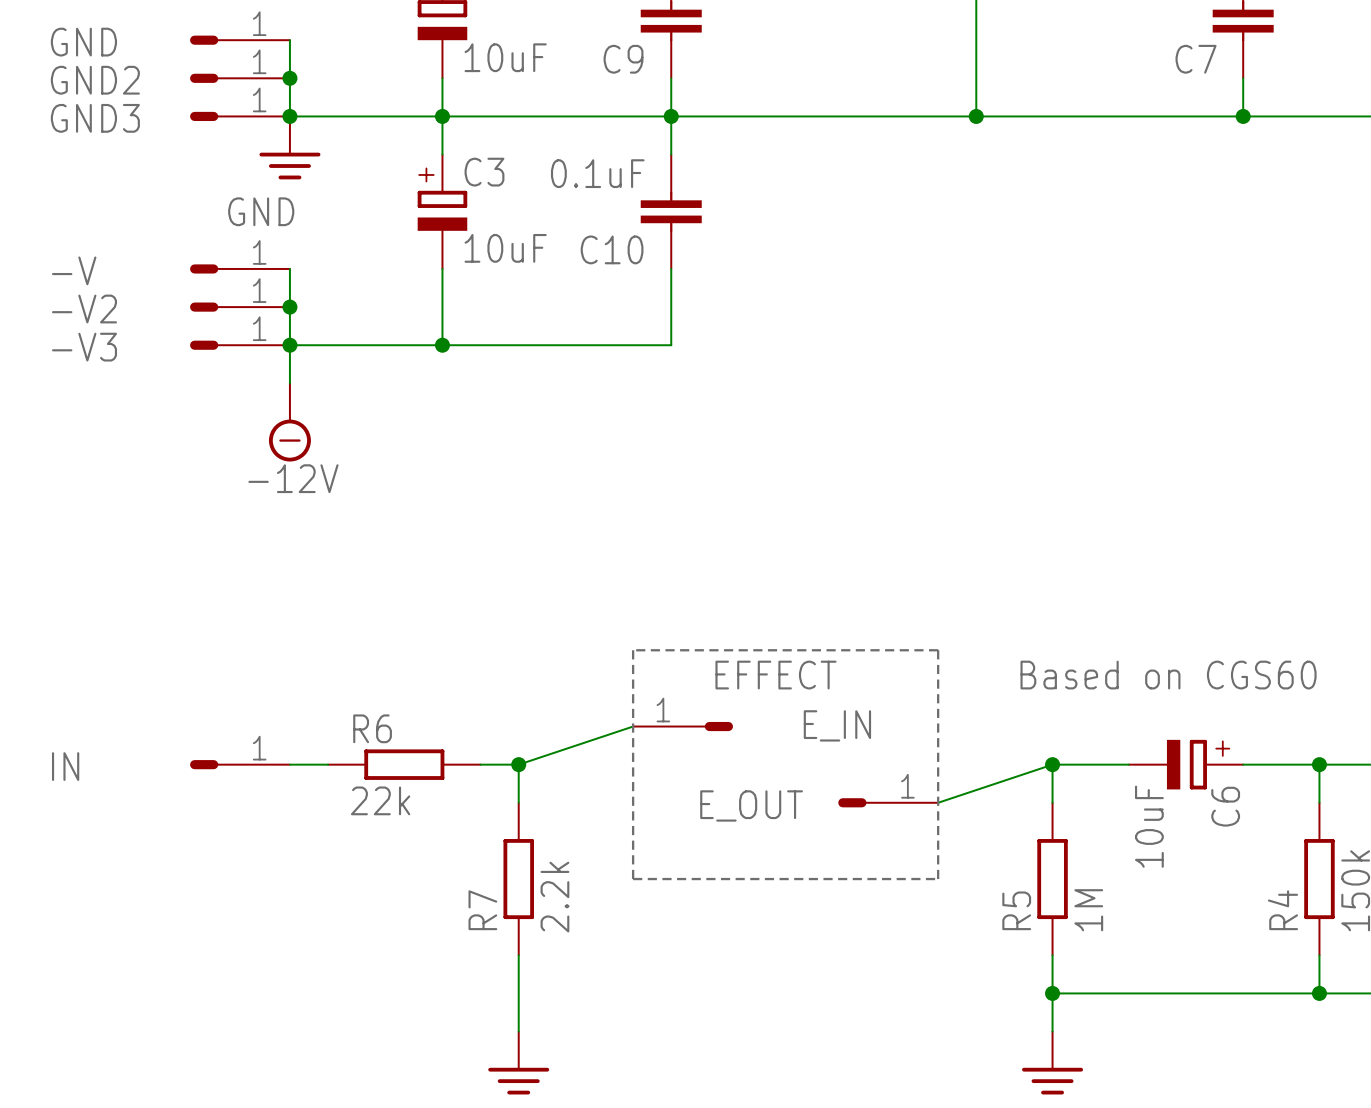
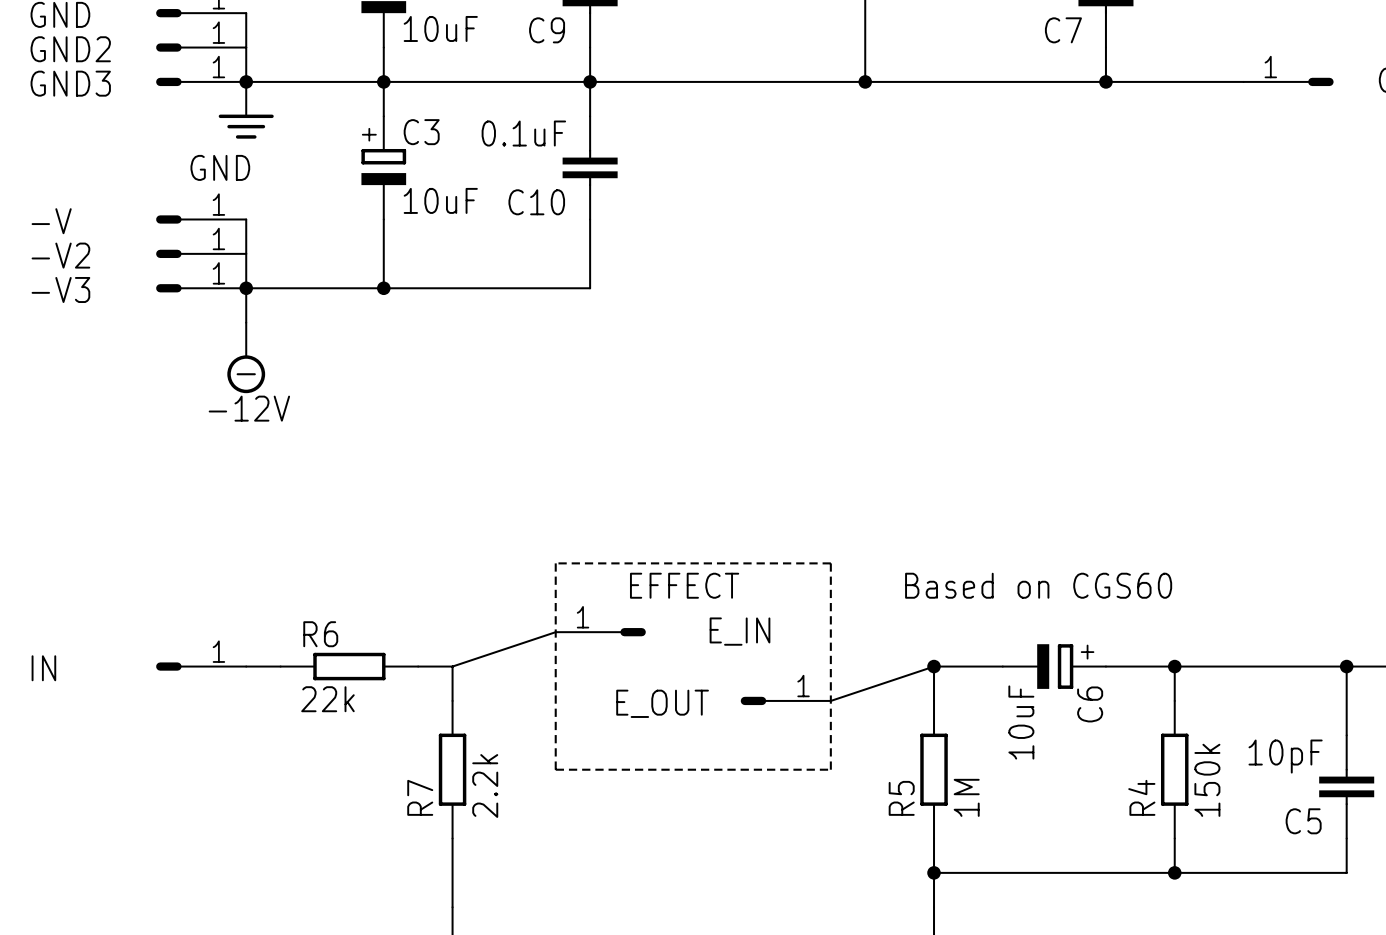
junction: (289, 78) -> none
junction: (289, 307) -> none
junction: (518, 764) -> none

